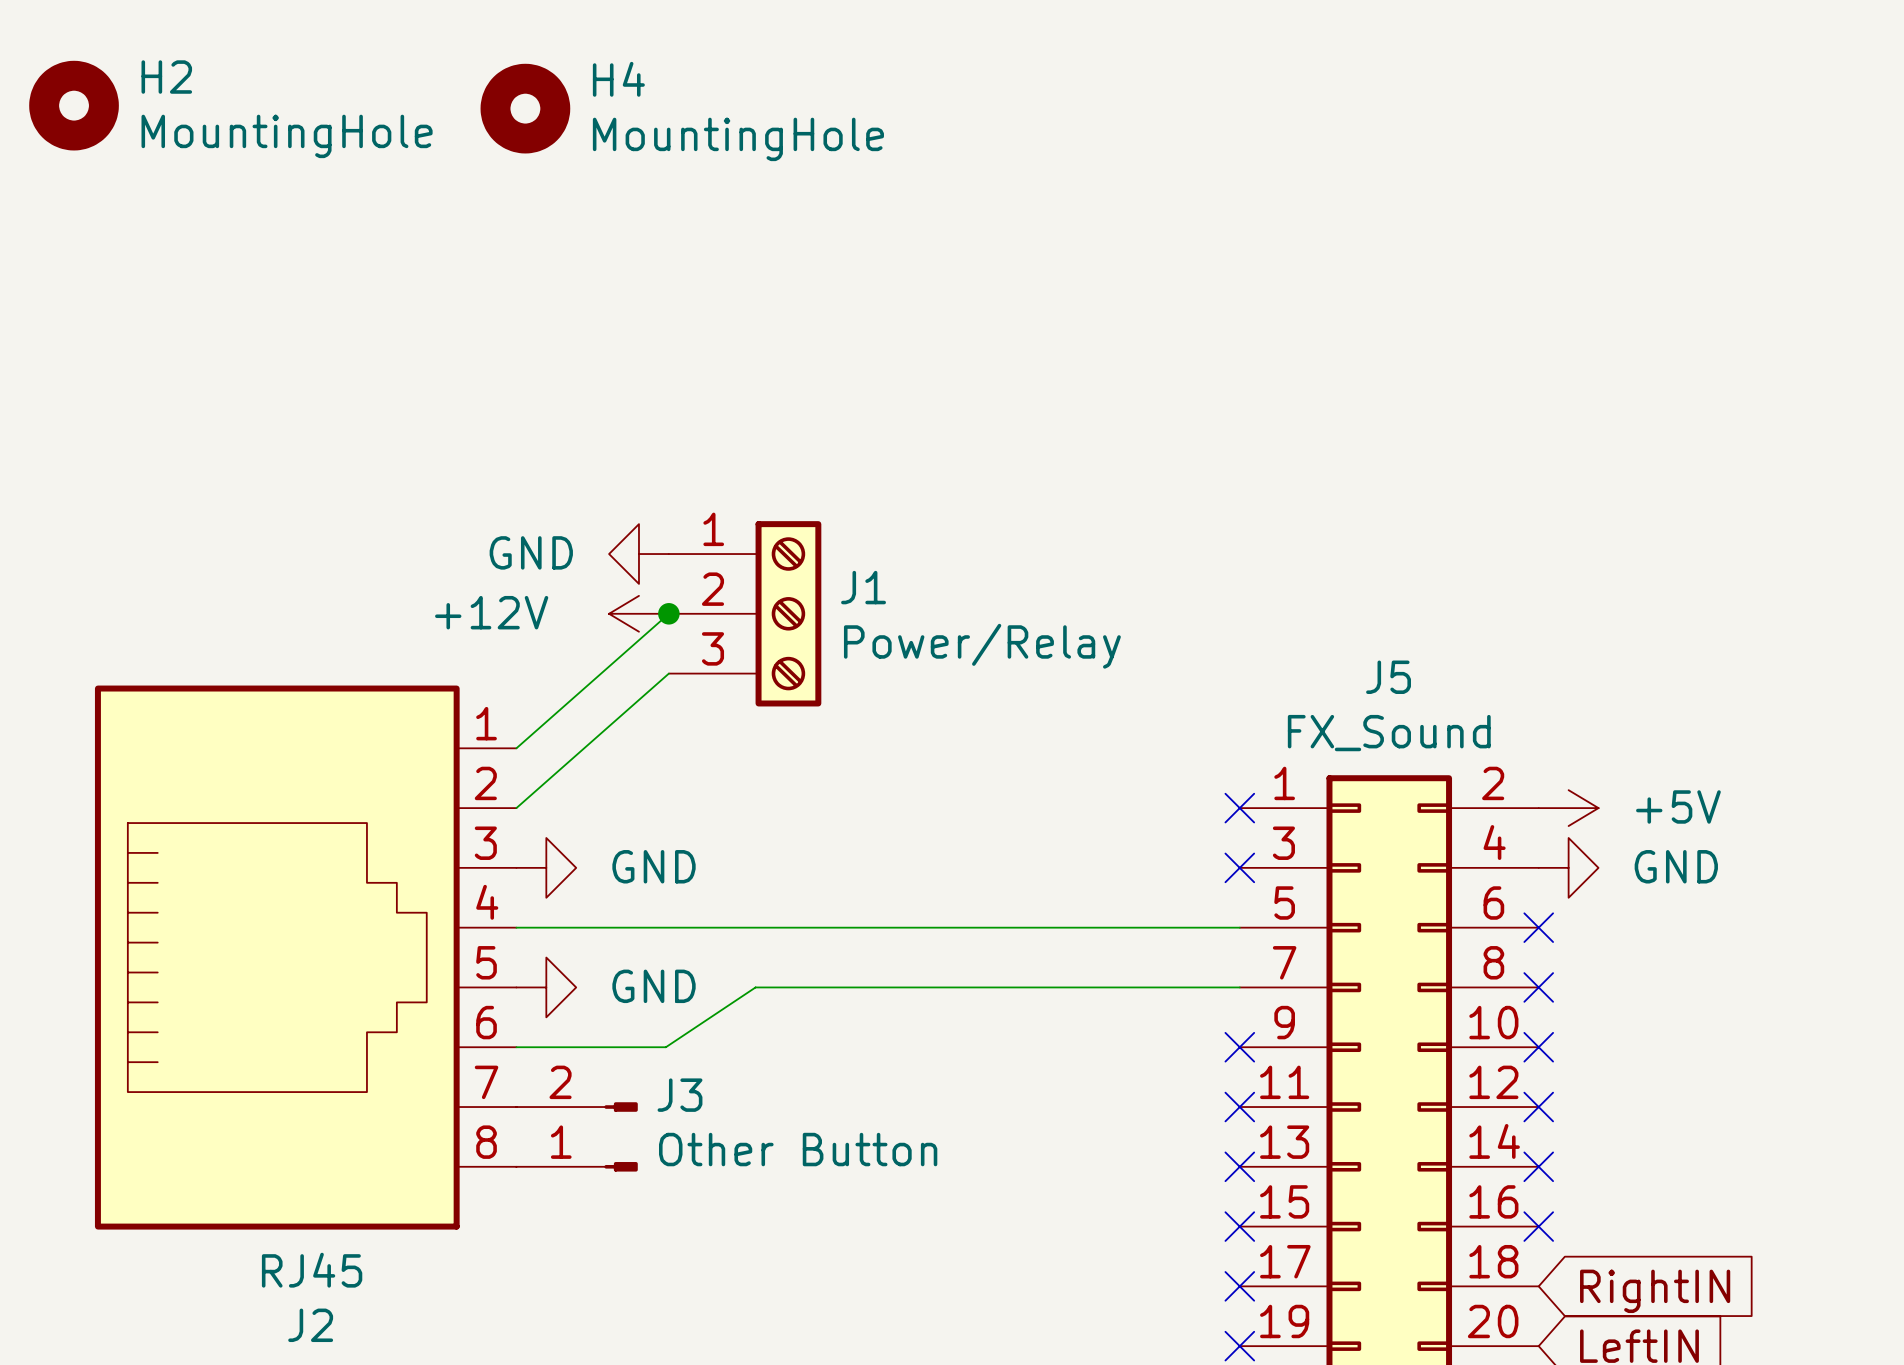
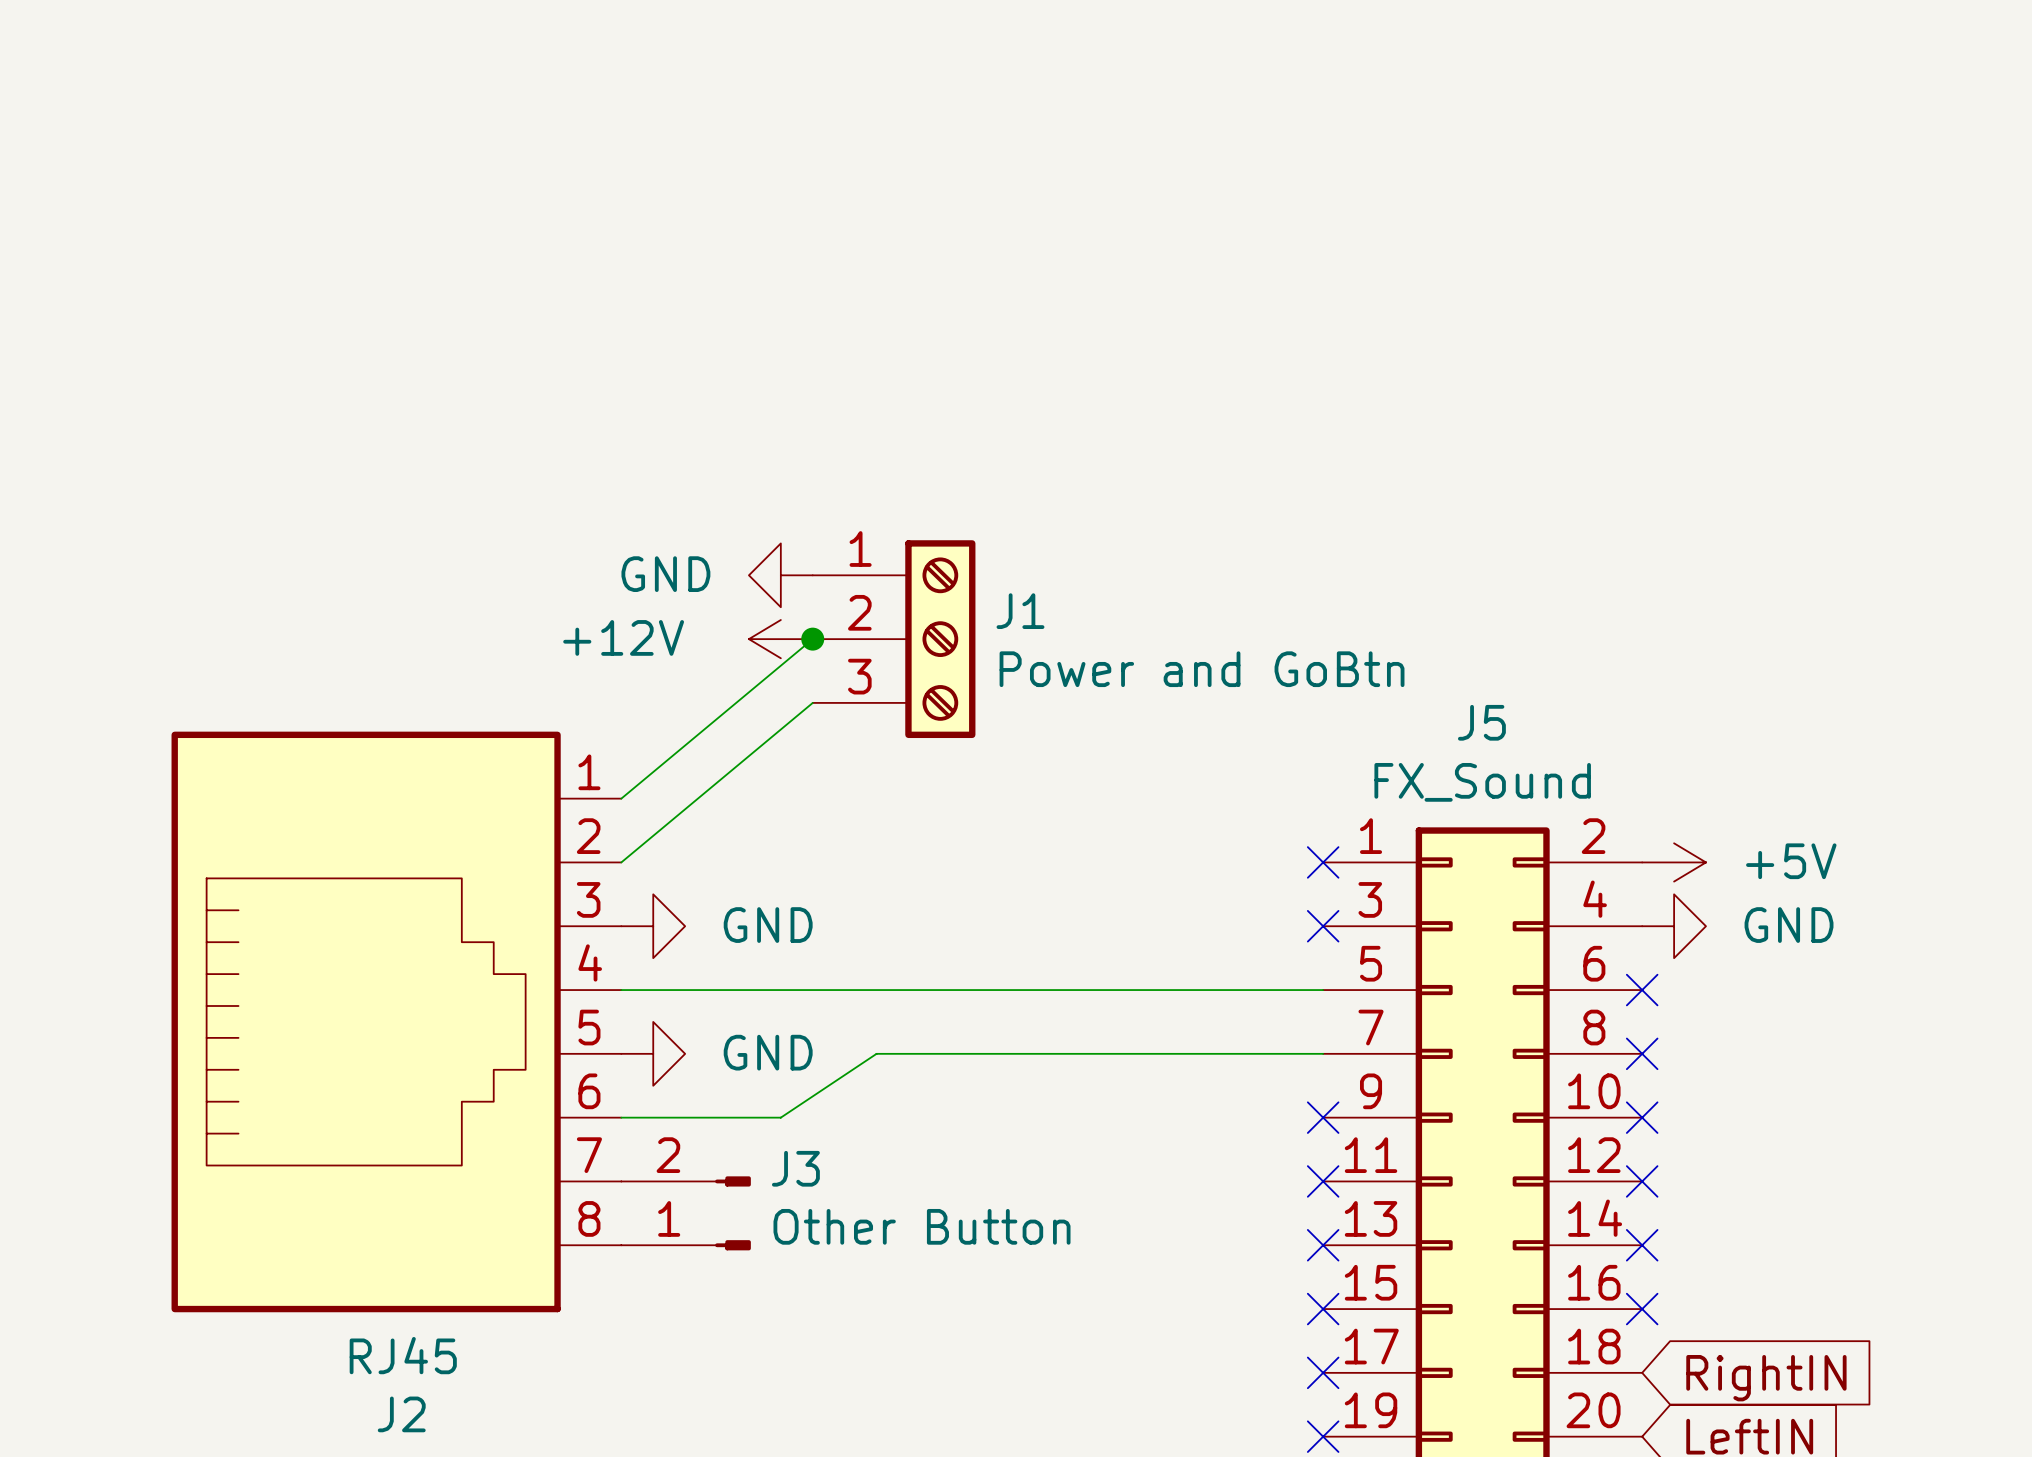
H2: MountingHole (74, 105) -> none
H4: MountingHole (525, 108) -> none
power symbol position: GND (638, 554) -> GND (780, 575)
wire: none -> (812, 639) (621, 798)
power symbol position: +12V (638, 613) -> +12V (780, 639)
wire: (668, 613) (516, 748) -> none
junction position: (668, 613) -> (812, 639)
J1 position: (745, 613) -> (894, 639)
J1 value: Power/Relay (982, 646) -> Power and GoBtn (1202, 669)
wire: none -> (812, 702) (621, 862)
wire: (668, 673) (516, 808) -> none
power symbol position: GND (546, 867) -> GND (653, 926)
J2 position: (305, 957) -> (396, 1021)
power symbol position: GND (546, 987) -> GND (653, 1053)
wire: (821, 987) (755, 987) (665, 1047) -> (876, 1053) (780, 1117) (710, 1117)
J3 position: (577, 1136) -> (686, 1213)

